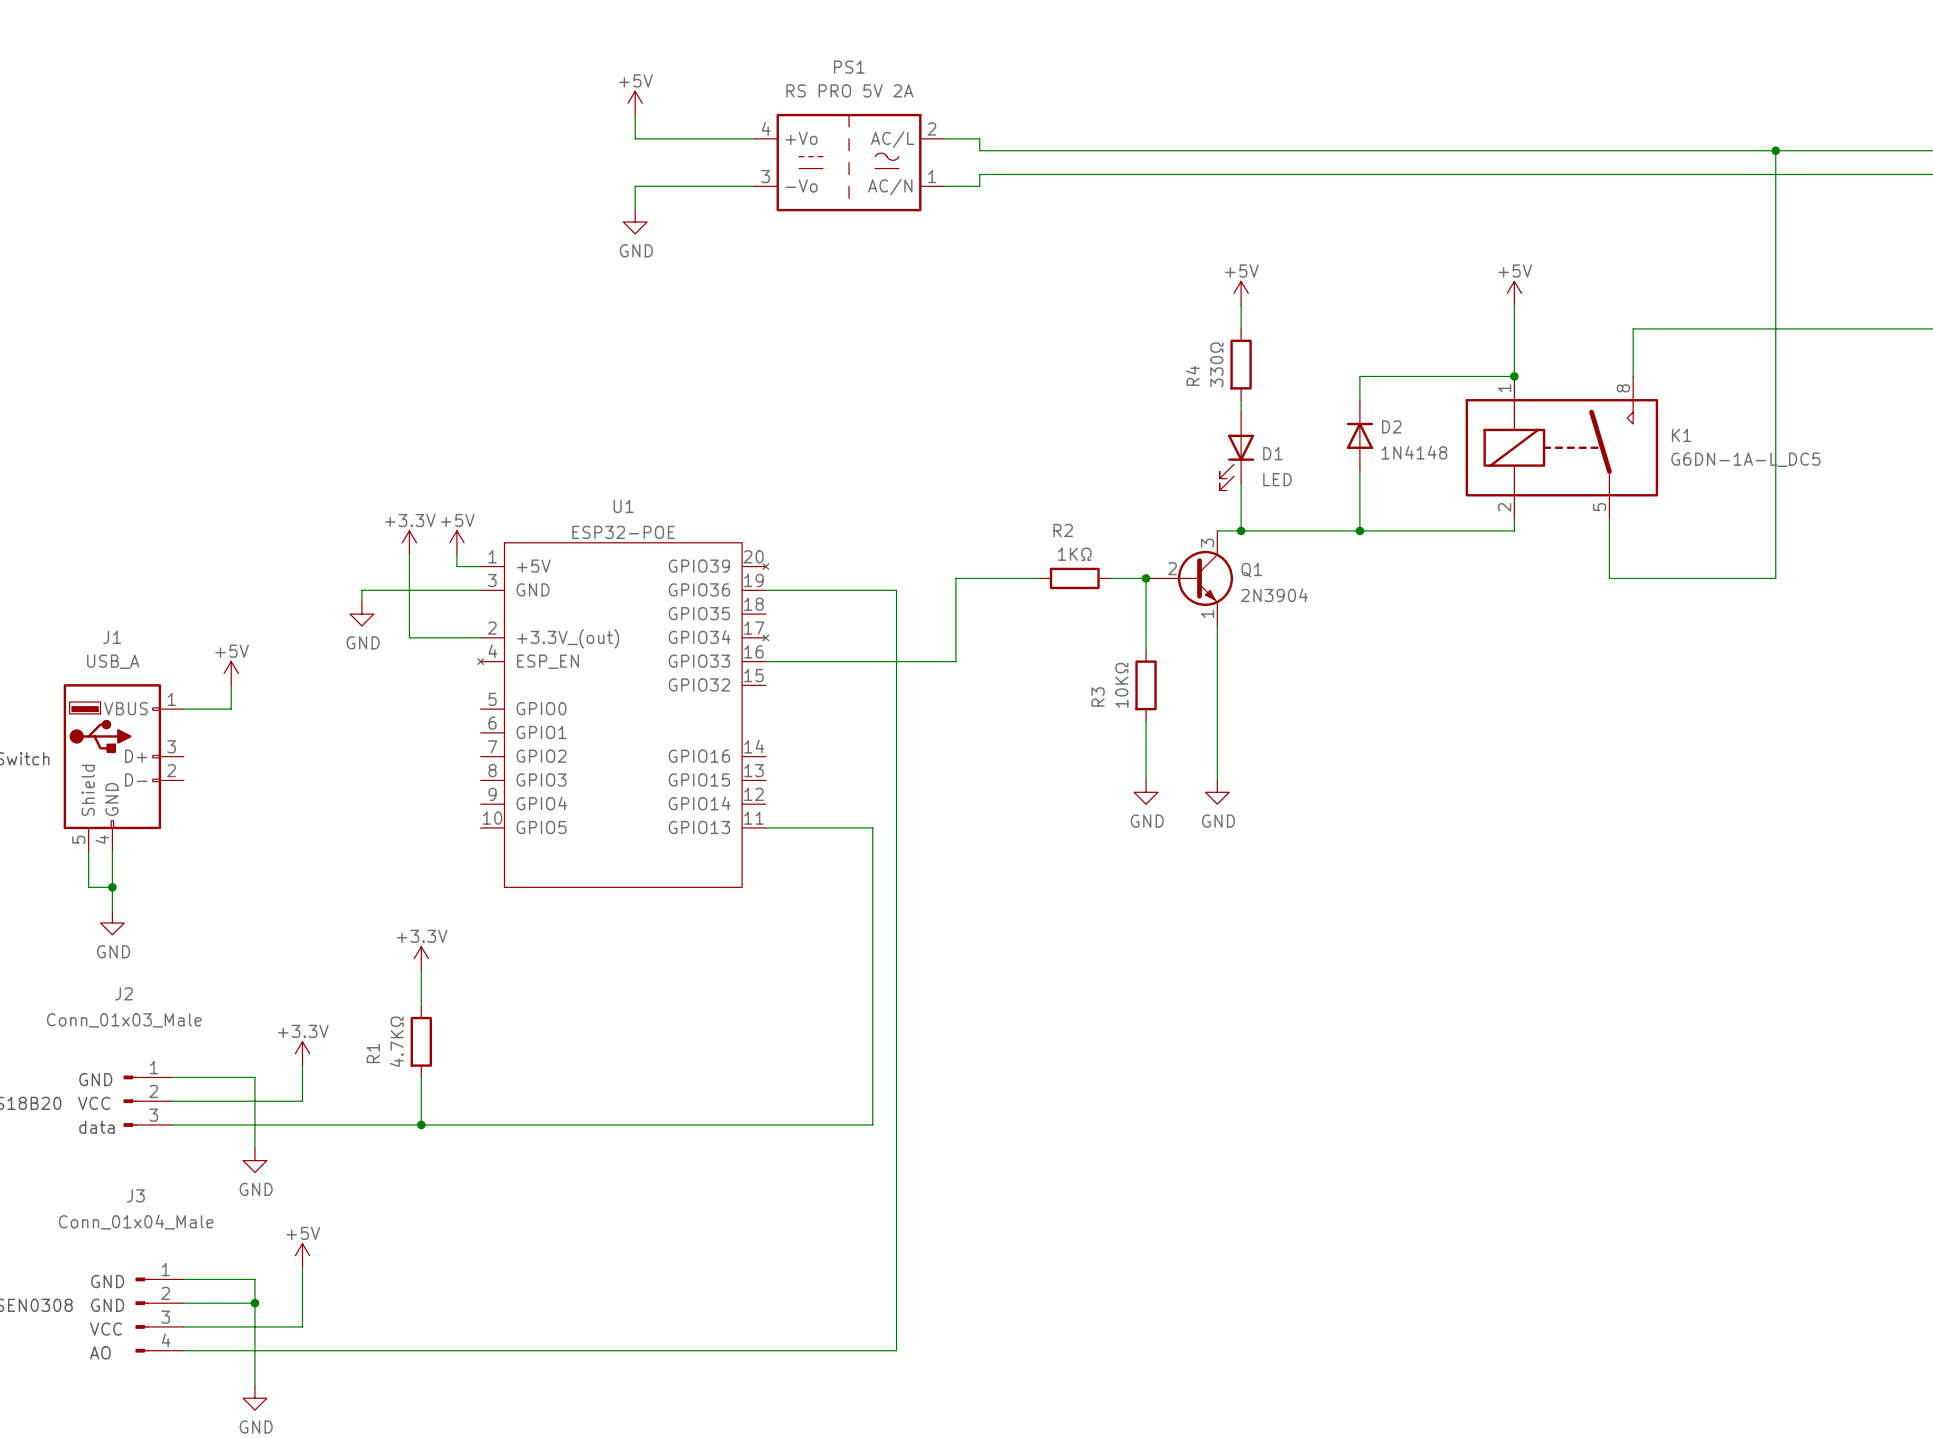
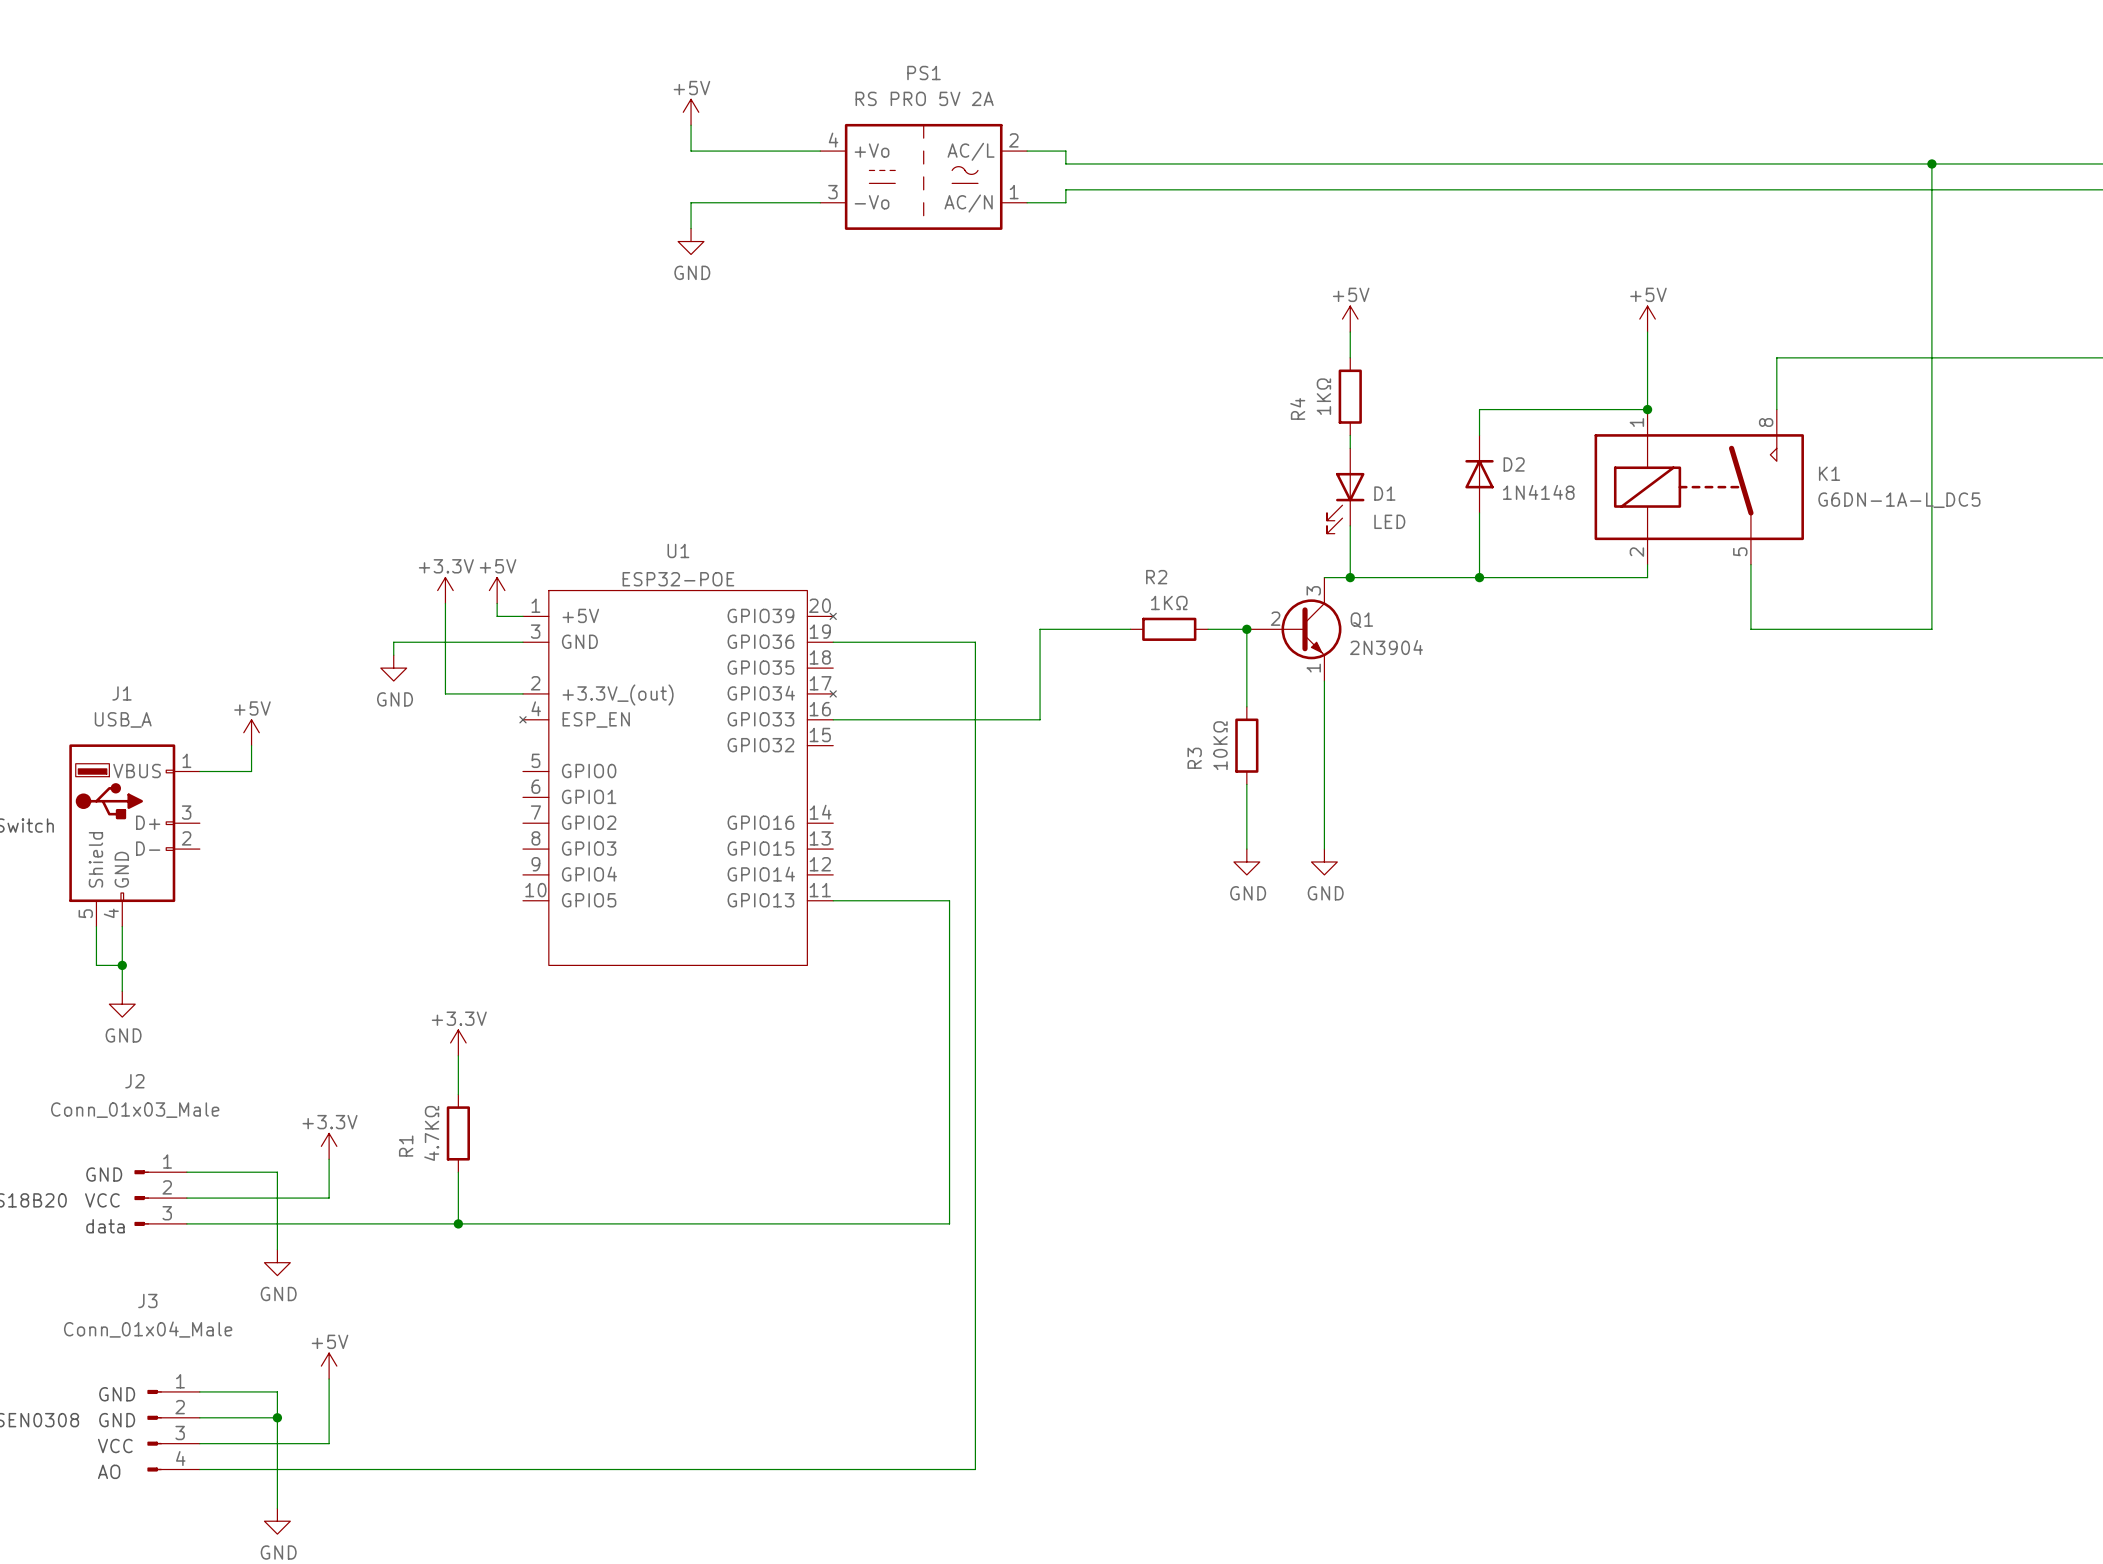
R4 value: 330Ω (1216, 364) -> 1KΩ (1323, 396)

